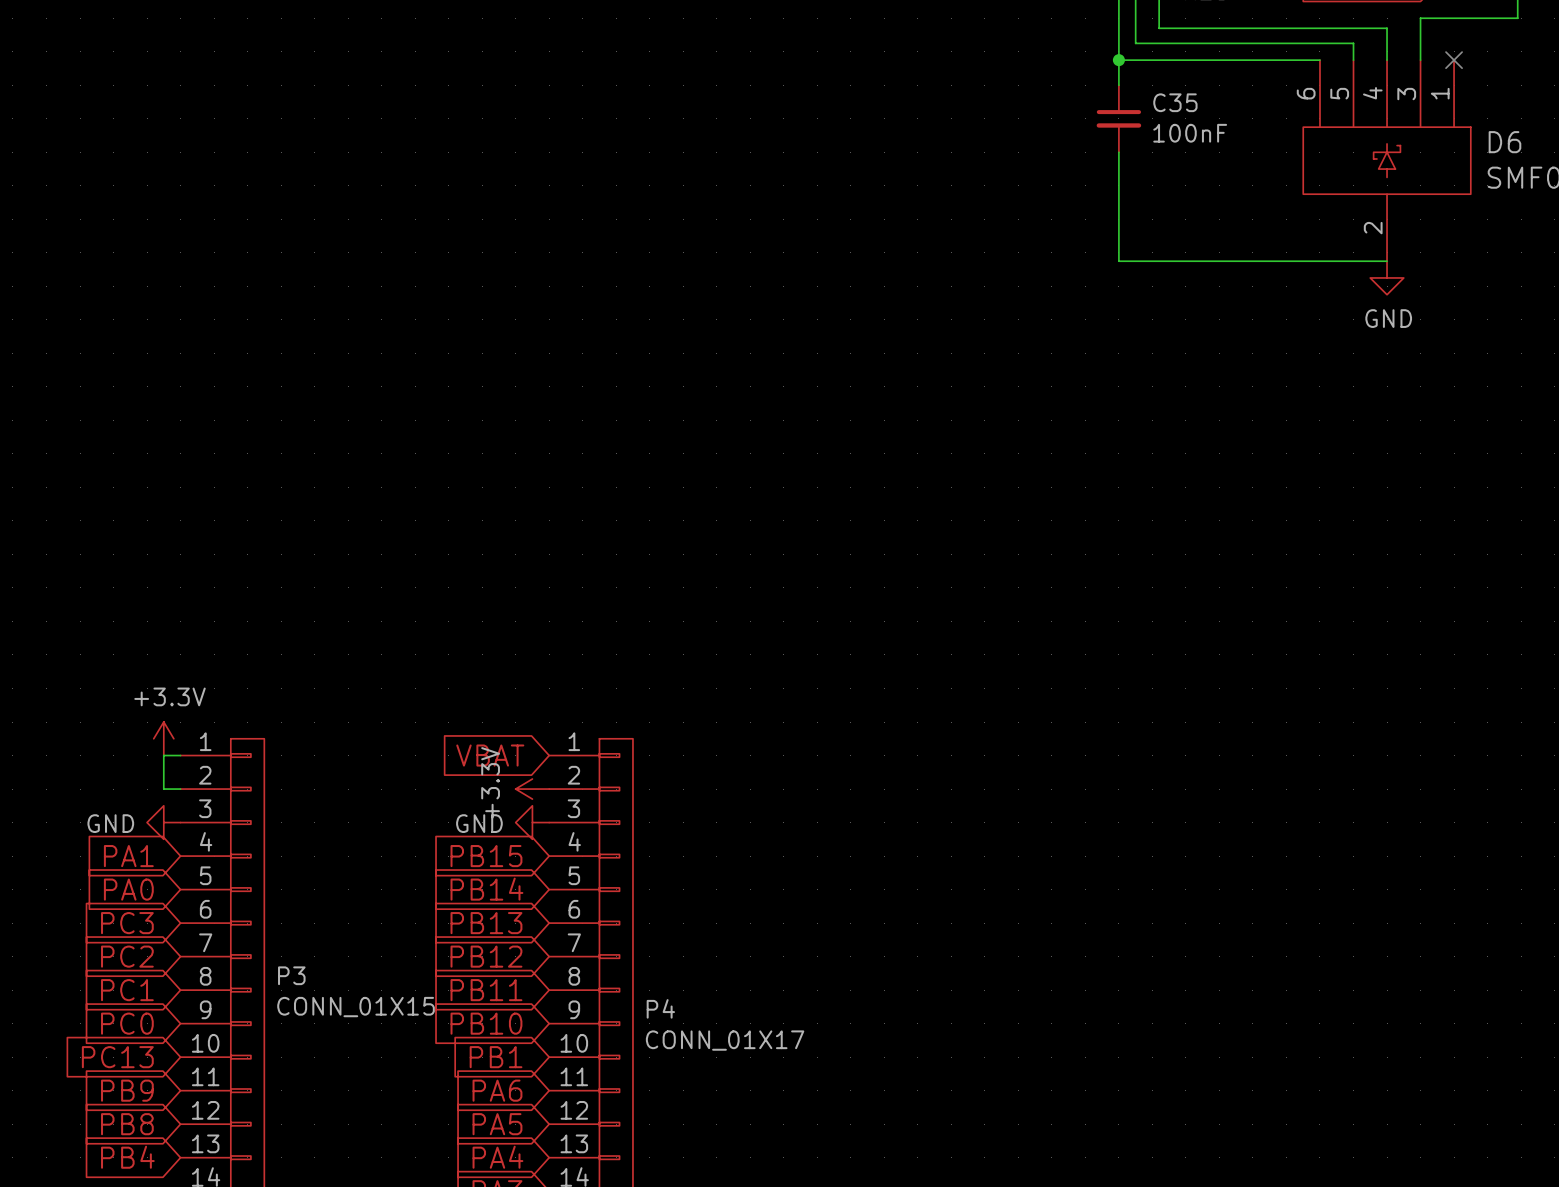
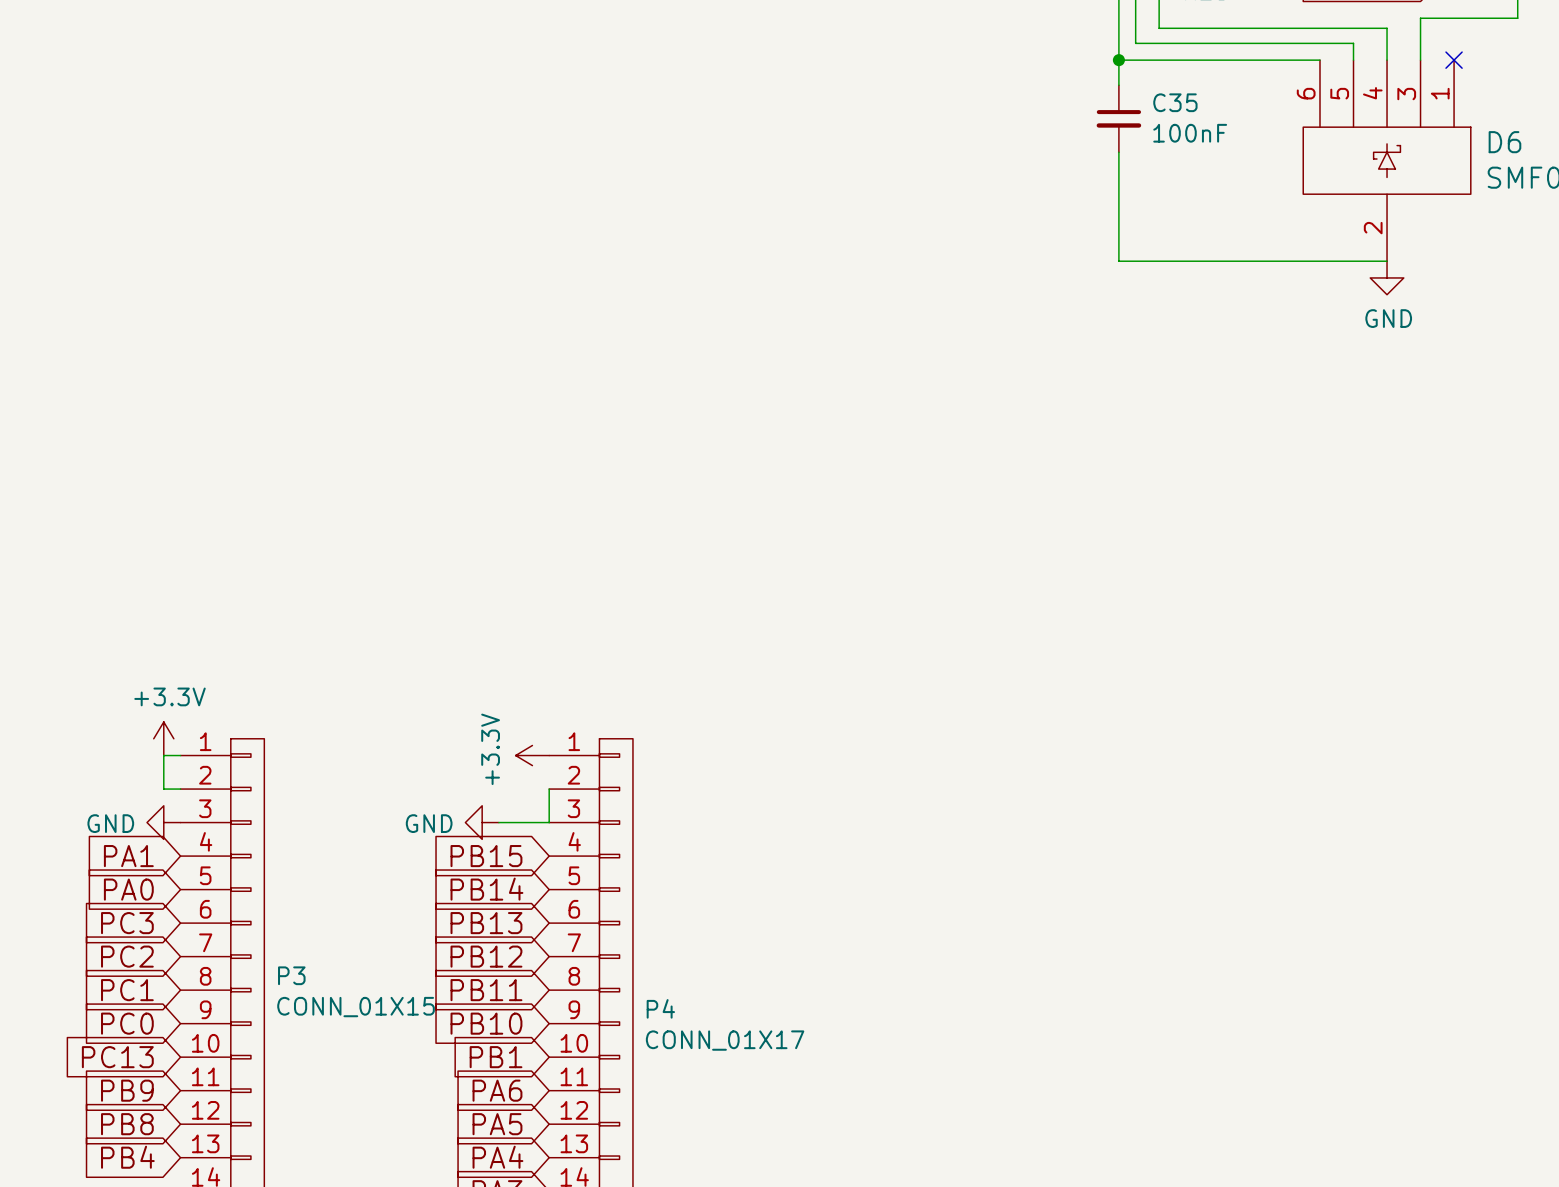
global label: VBAT (490, 755) -> none
power symbol position: +3.3V (532, 789) -> +3.3V (532, 755)
wire: none -> (549, 789) (549, 822) (498, 822)
power symbol position: GND (532, 822) -> GND (482, 822)

